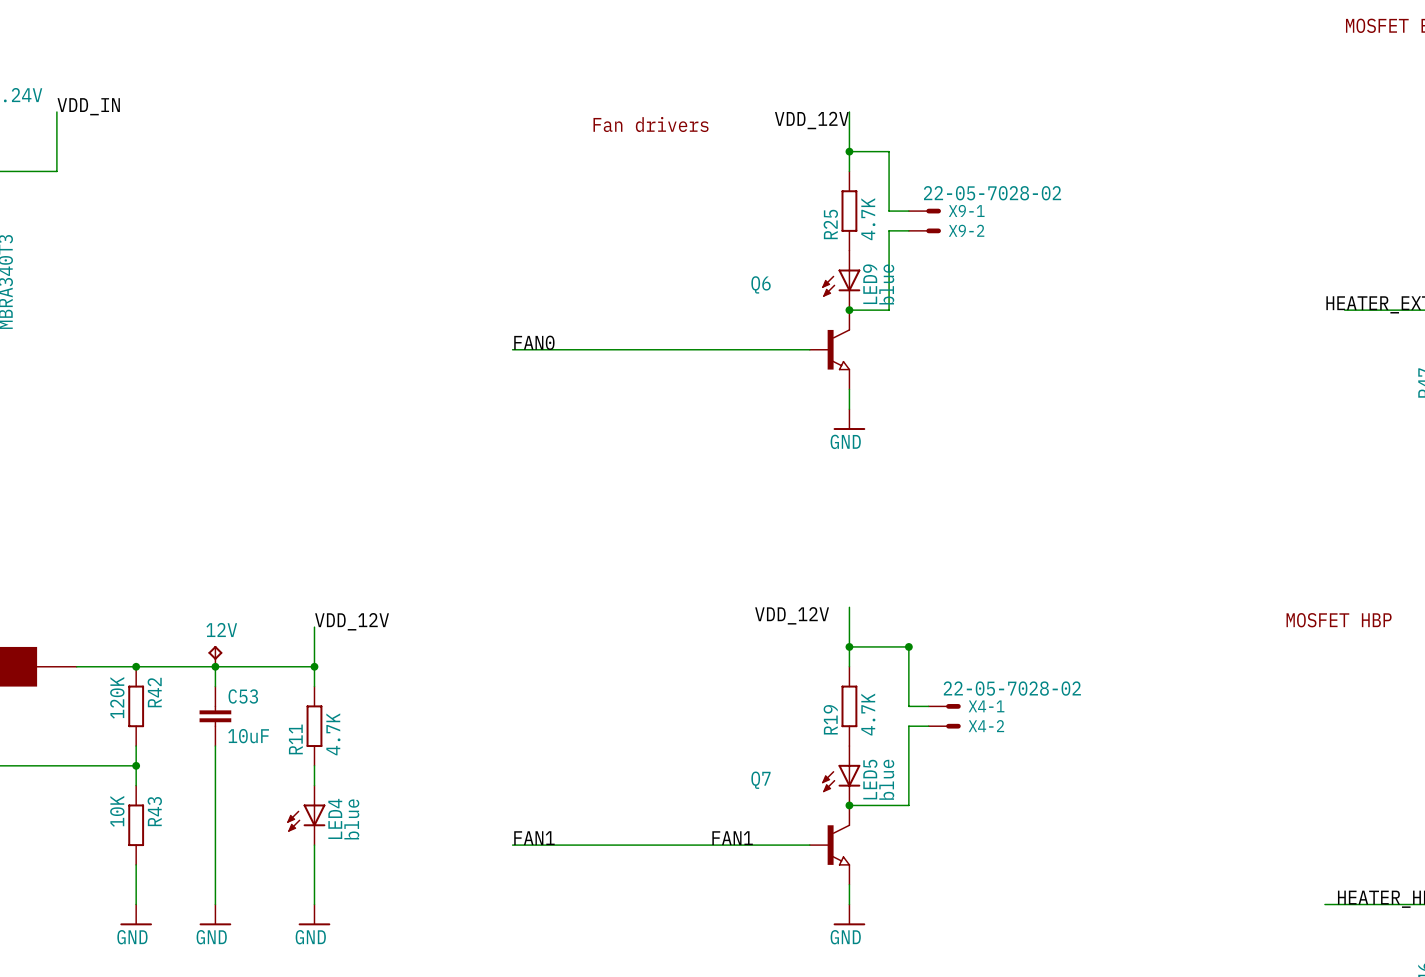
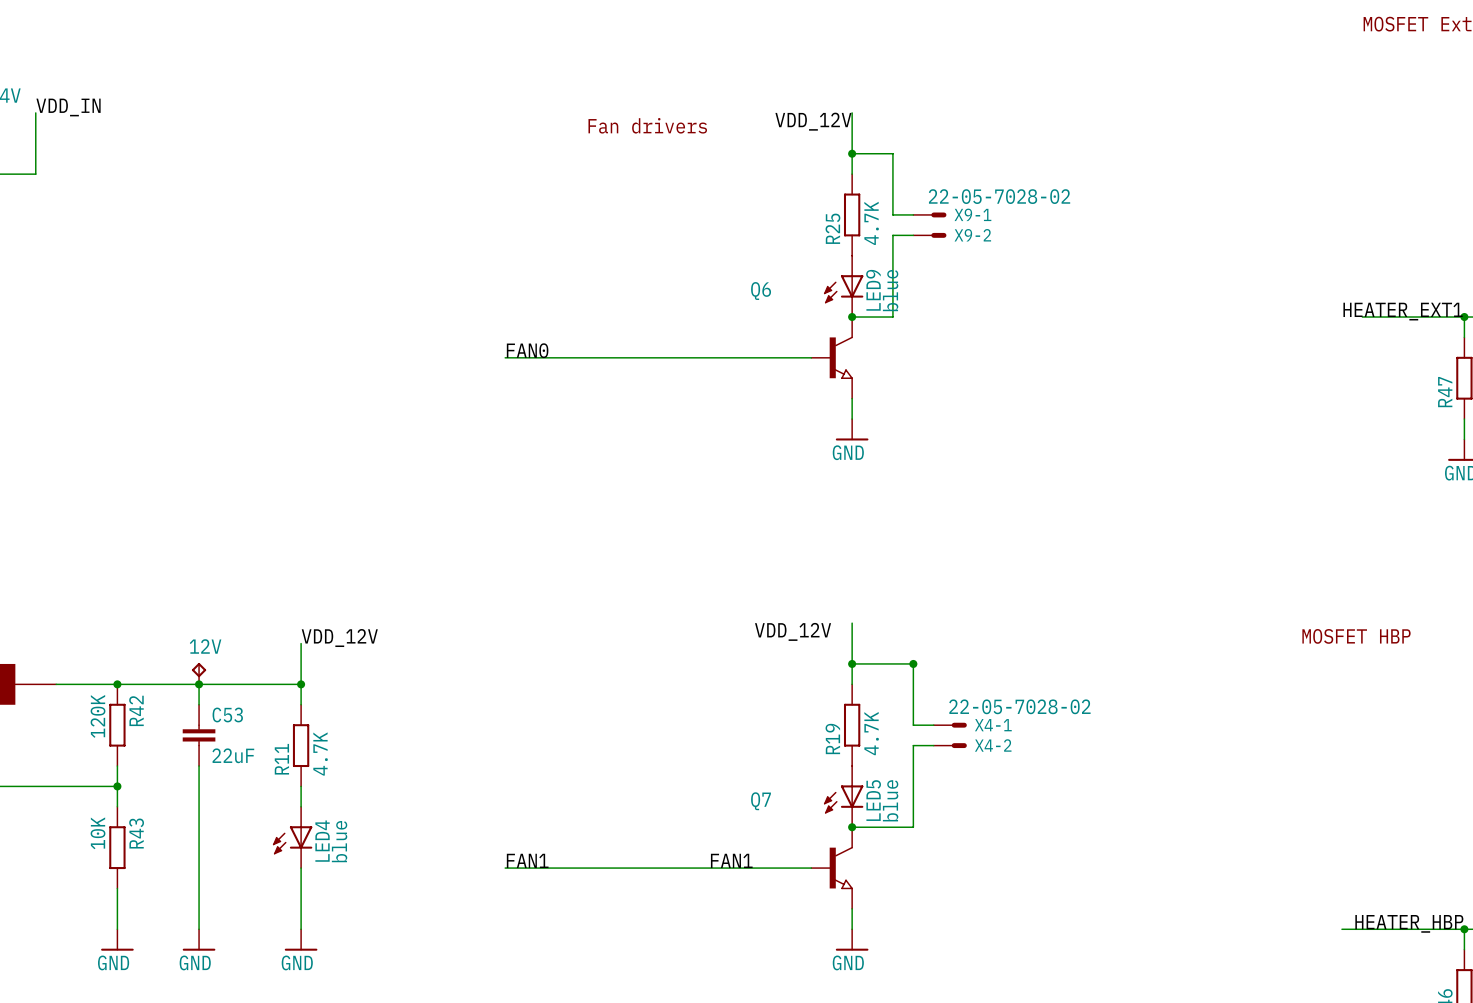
C53 value: 10uF (248, 736) -> 22uF (233, 755)

